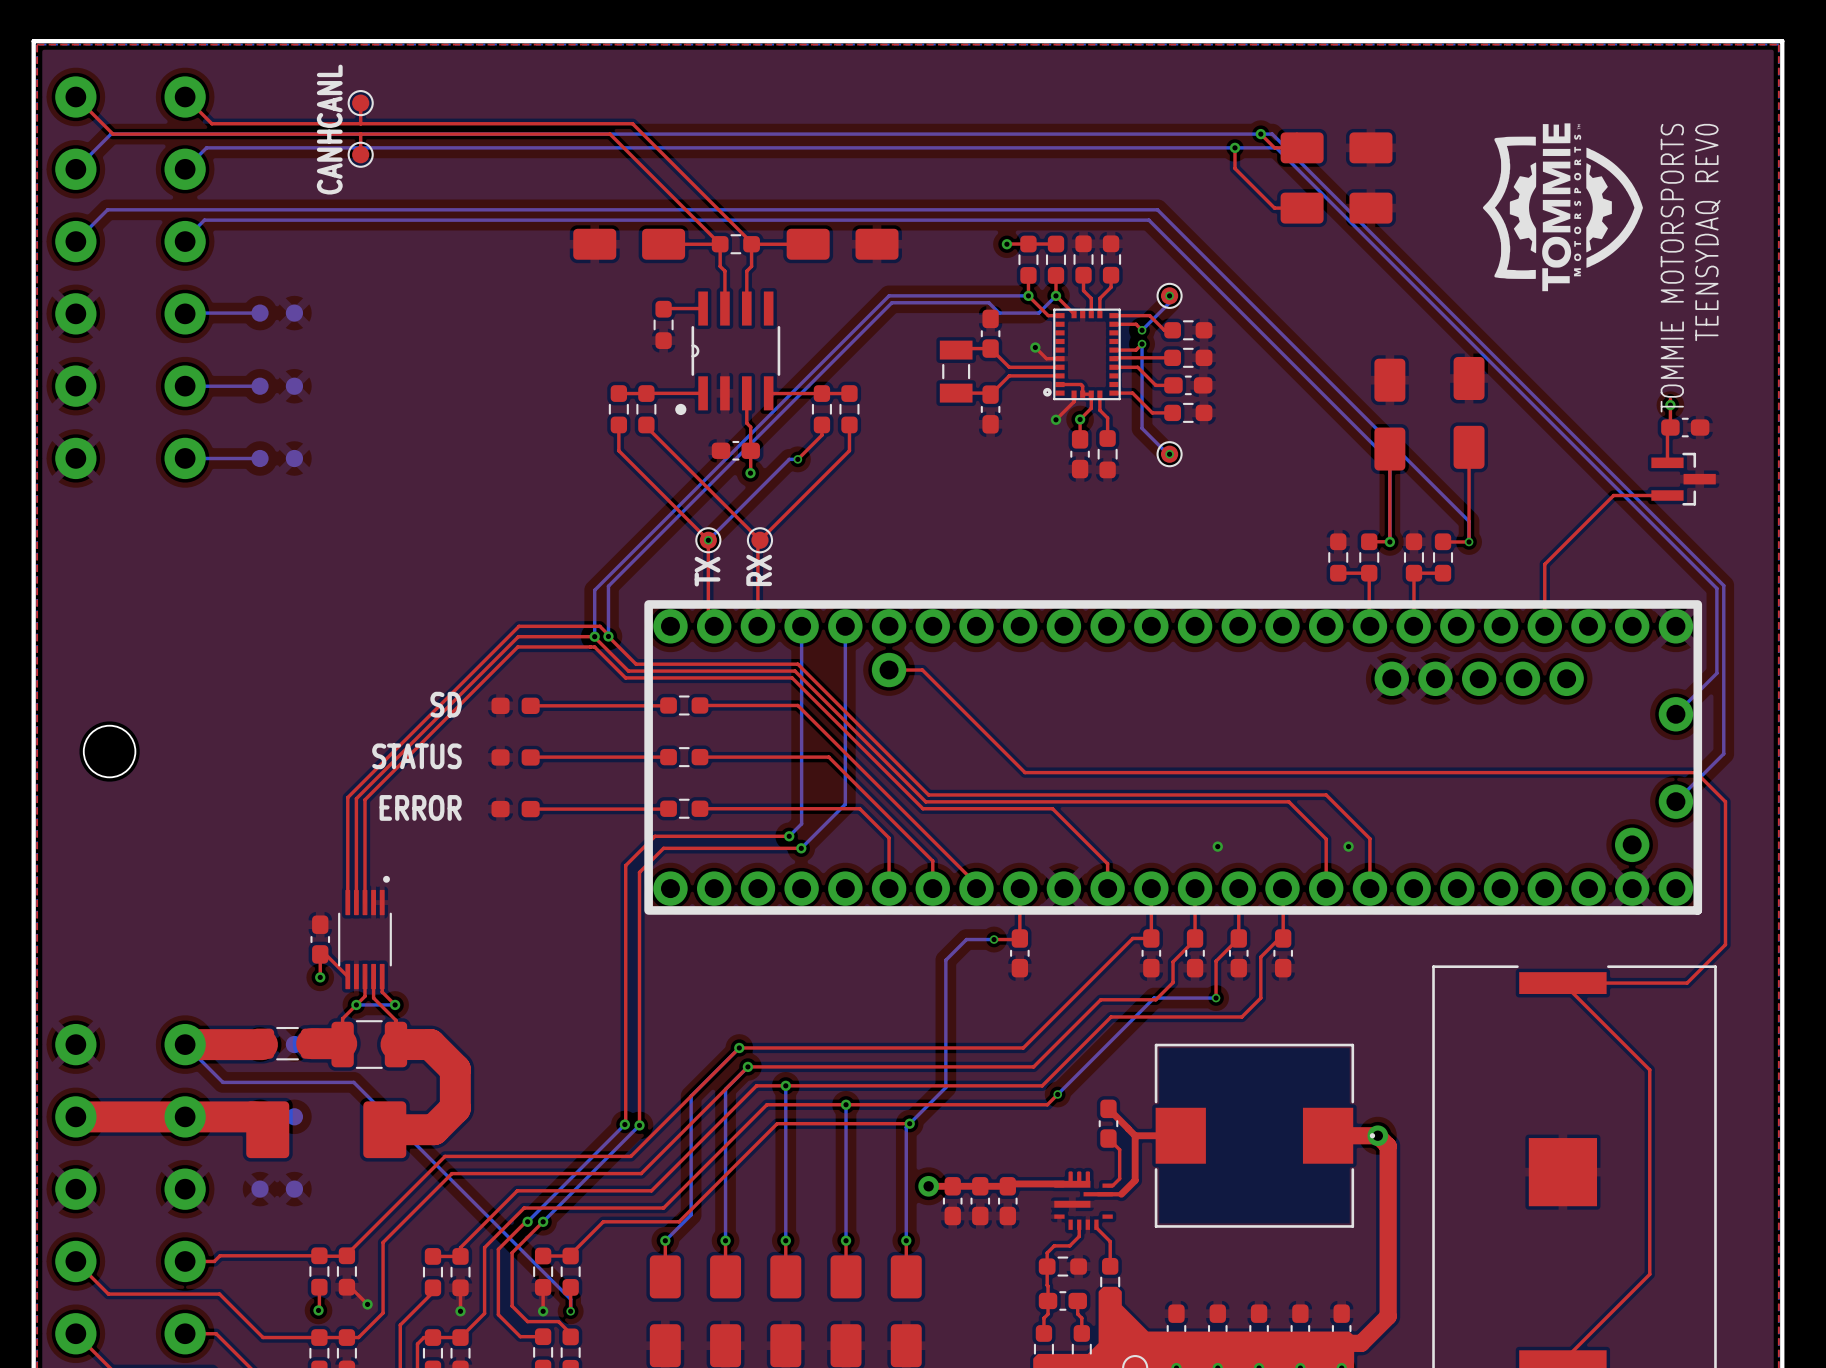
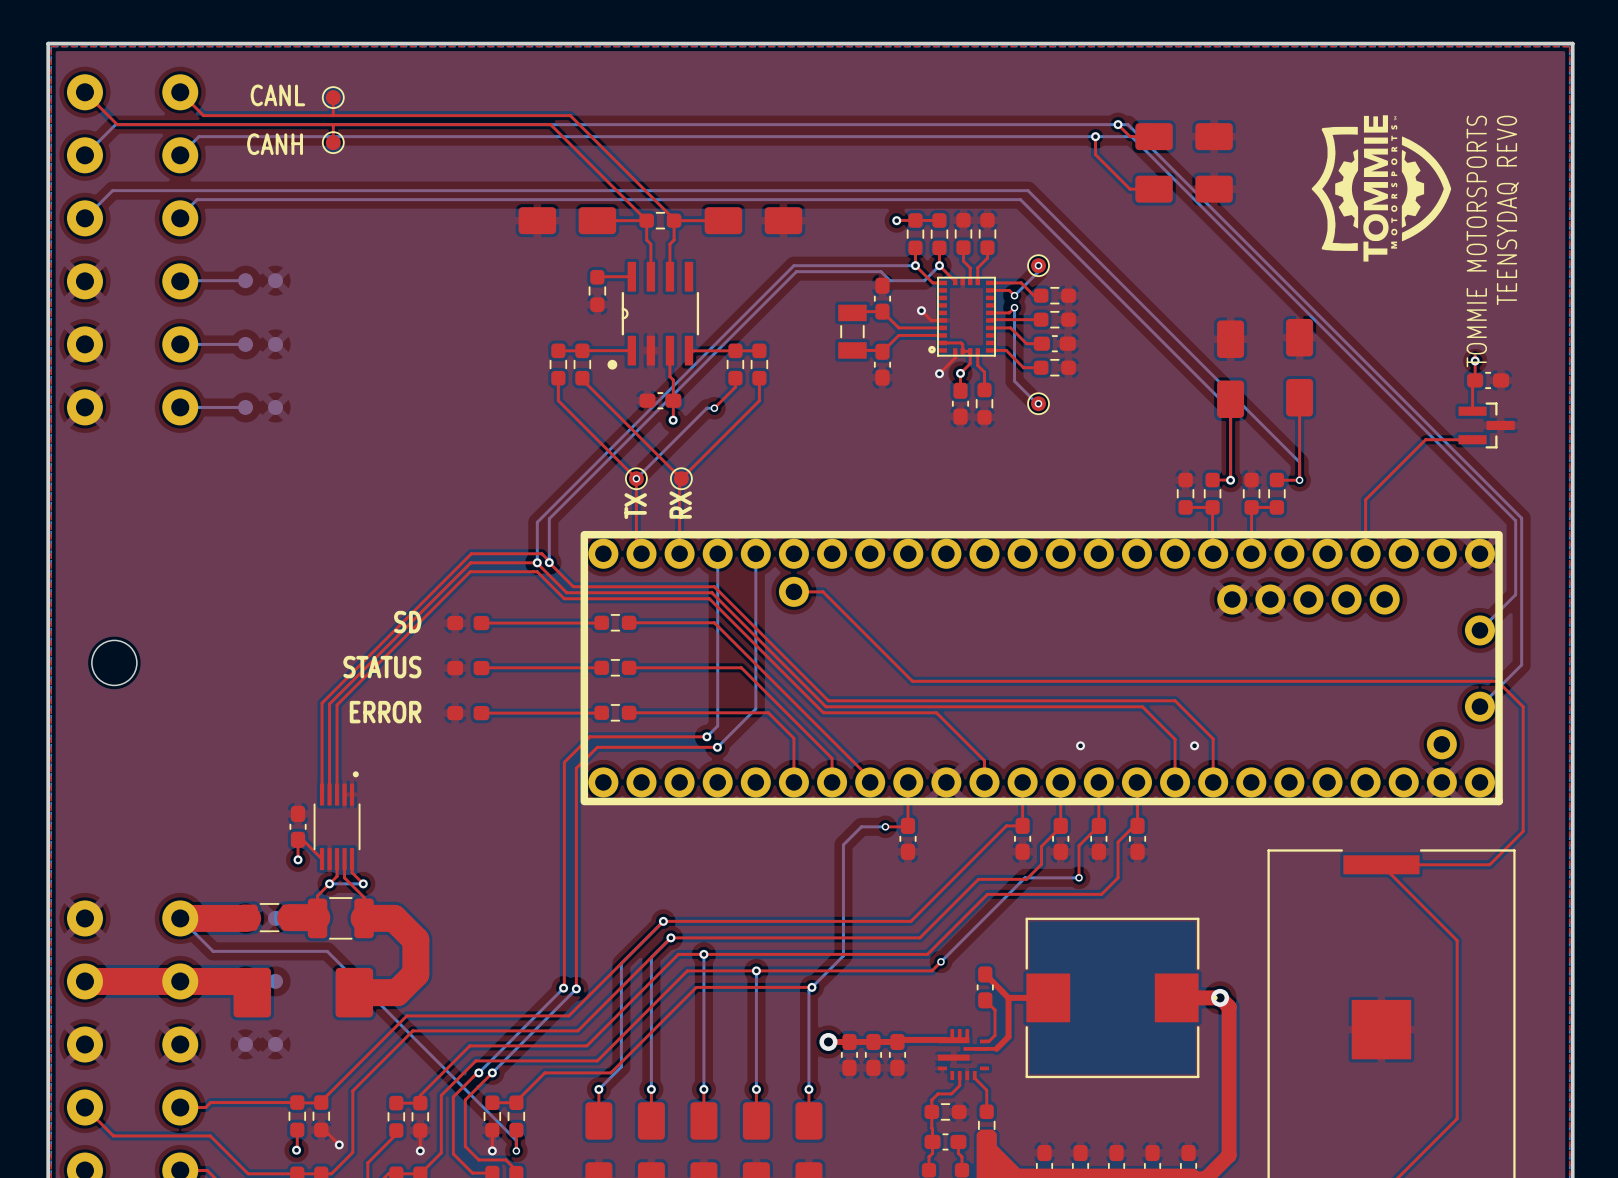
CANL name rotation: 0° (329, 96) -> 90° clockwise (277, 95)
CANH name rotation: 0° (329, 162) -> 90° clockwise (275, 144)

